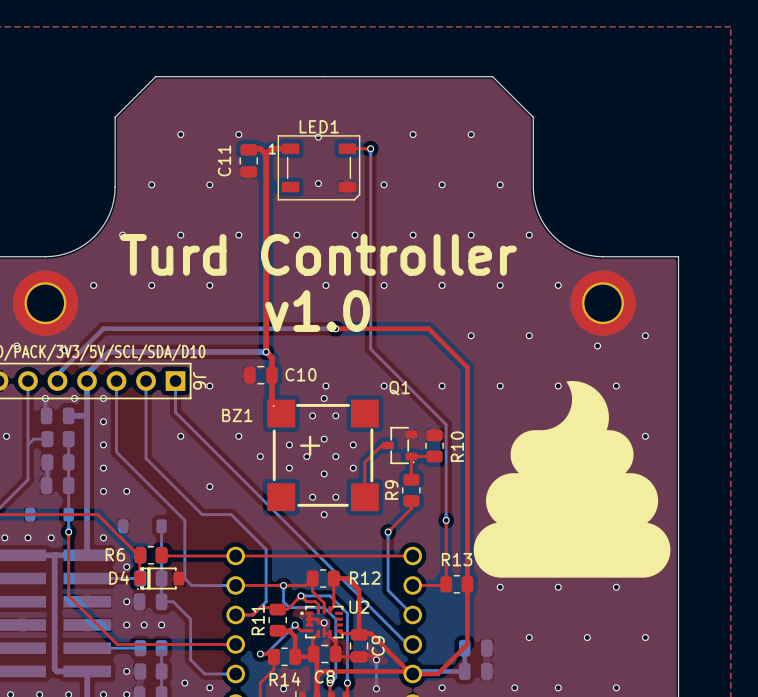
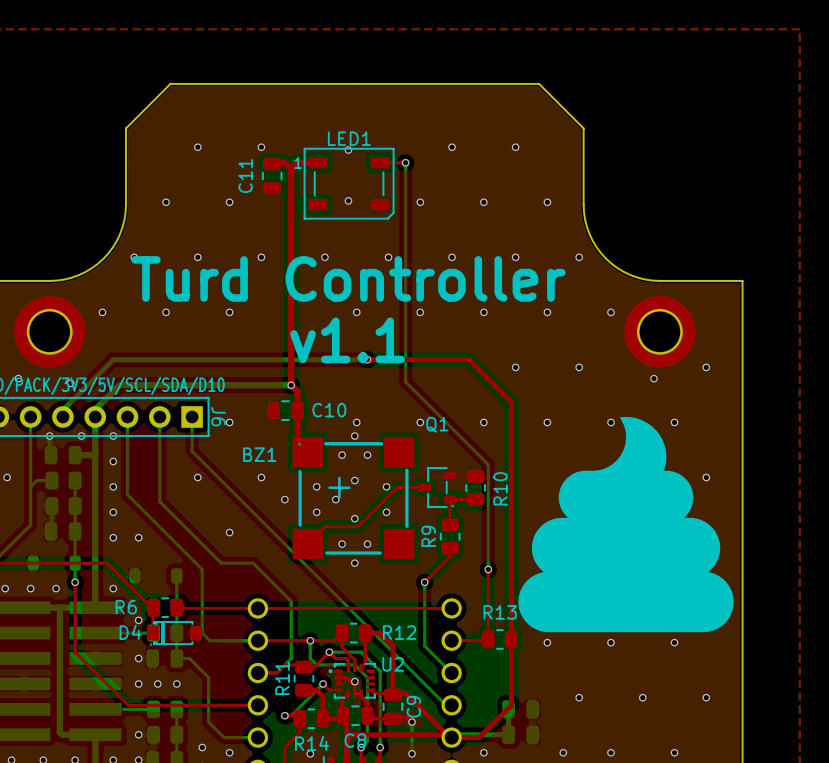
text: v1.0 (317, 311) -> v1.1 (347, 340)
top track: (381, 445) (364, 462) (364, 497) -> (417, 487) (397, 487) (358, 526) (325, 526) (307, 544)
via: (335, 456) -> none

